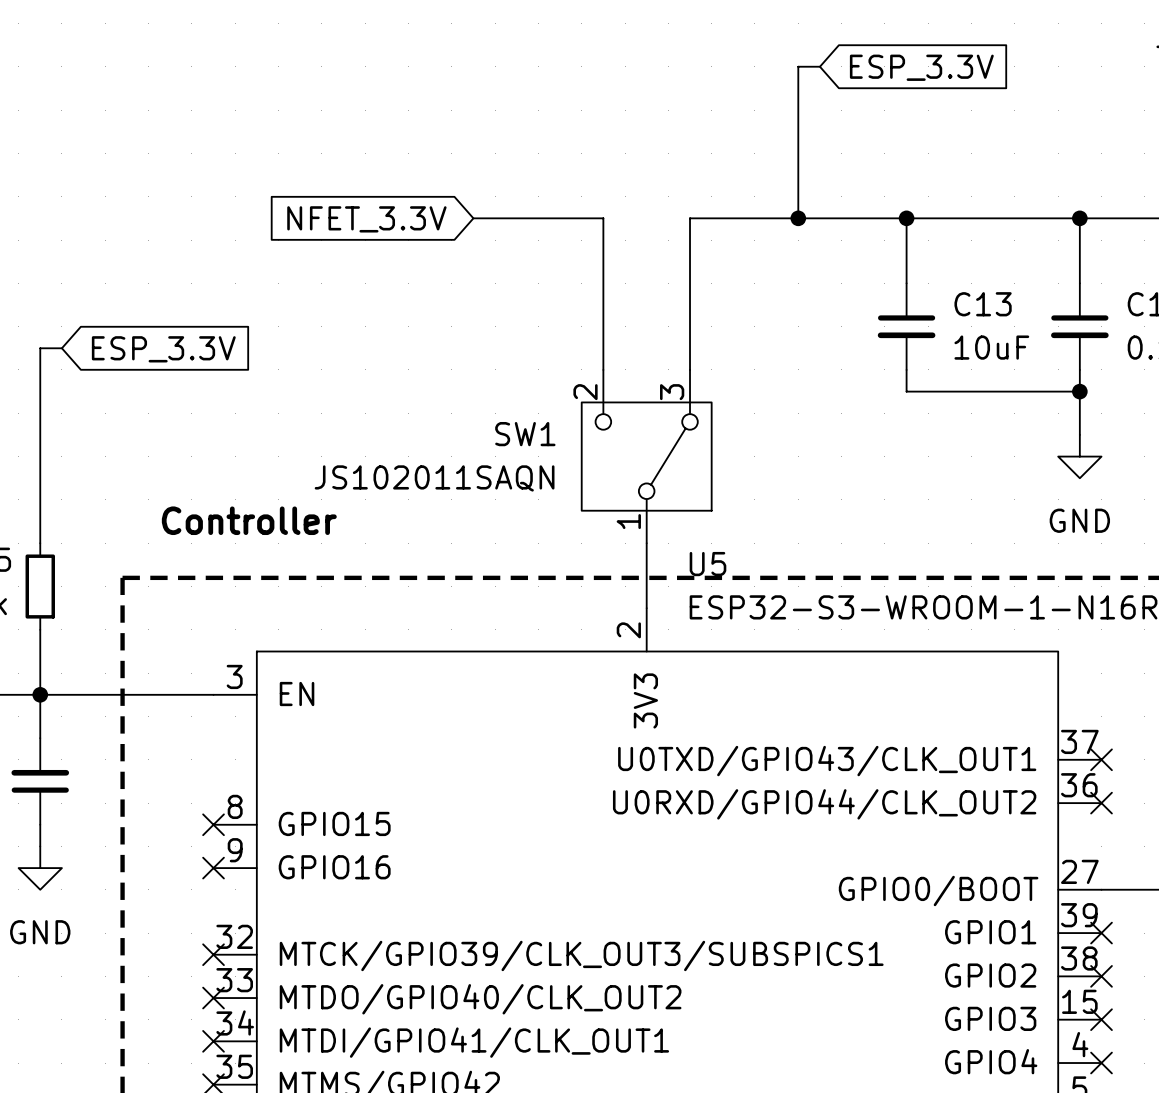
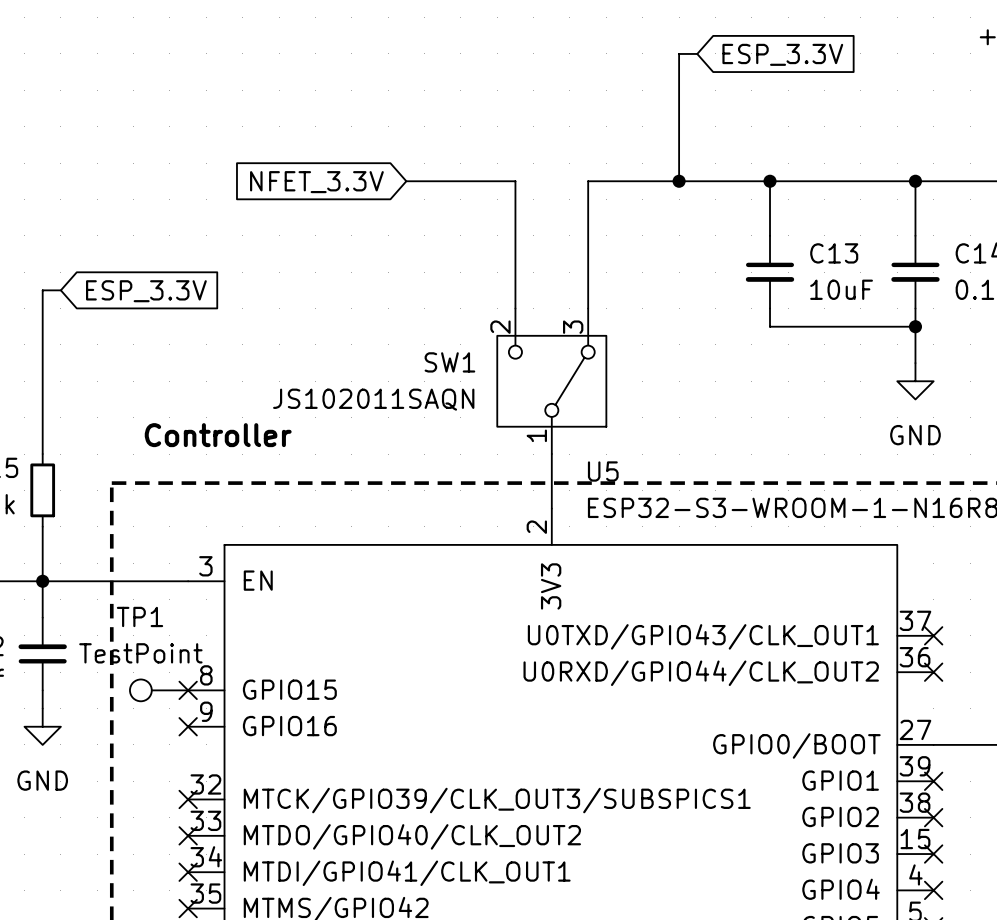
TP1: none -> TestPoint (159, 690)

